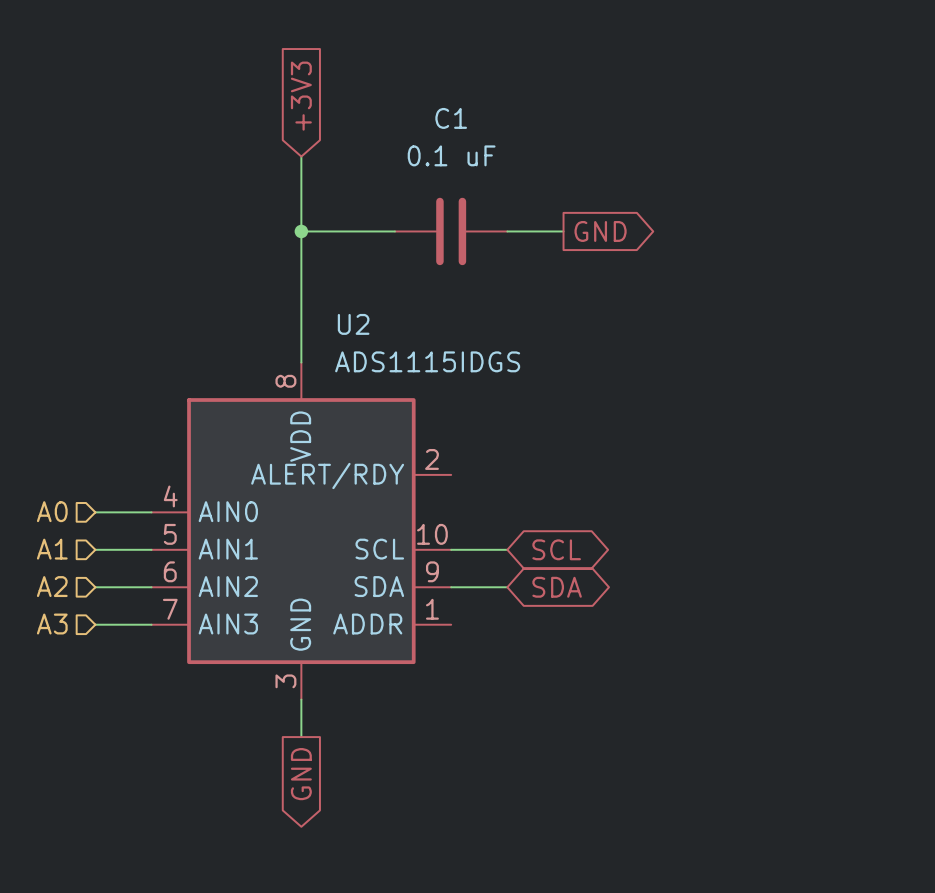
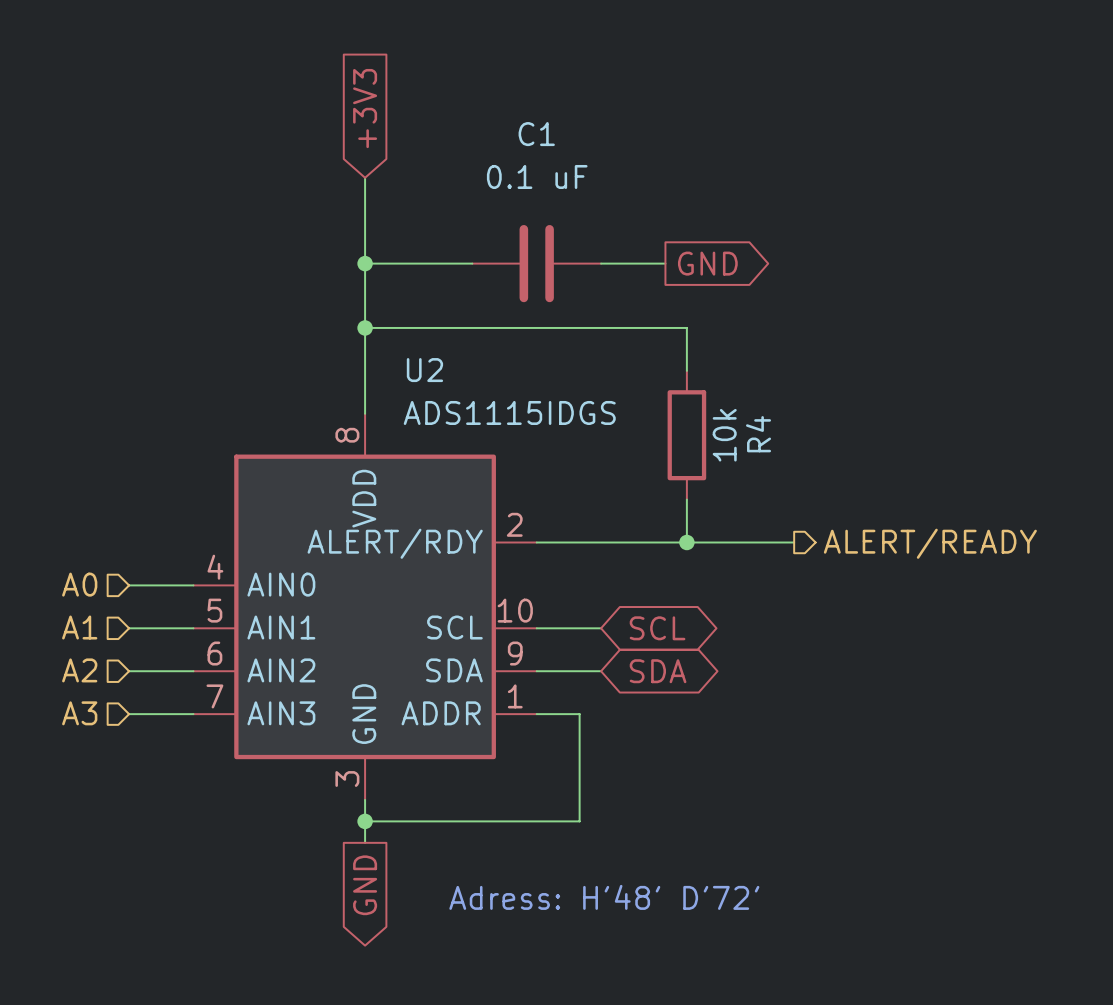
wire: none -> (365, 327) (686, 327) (686, 370)
junction: none -> (365, 327)
R4: none -> 10k (686, 435)
wire: none -> (686, 499) (686, 542)
wire: none -> (536, 542) (794, 542)
junction: none -> (686, 542)
hierarchical label: none -> ALERT/READY (930, 543)
wire: none -> (536, 714) (579, 714) (579, 821) (365, 821)
junction: none -> (365, 821)
text: none -> Adress: H'48' D'72' (604, 897)

